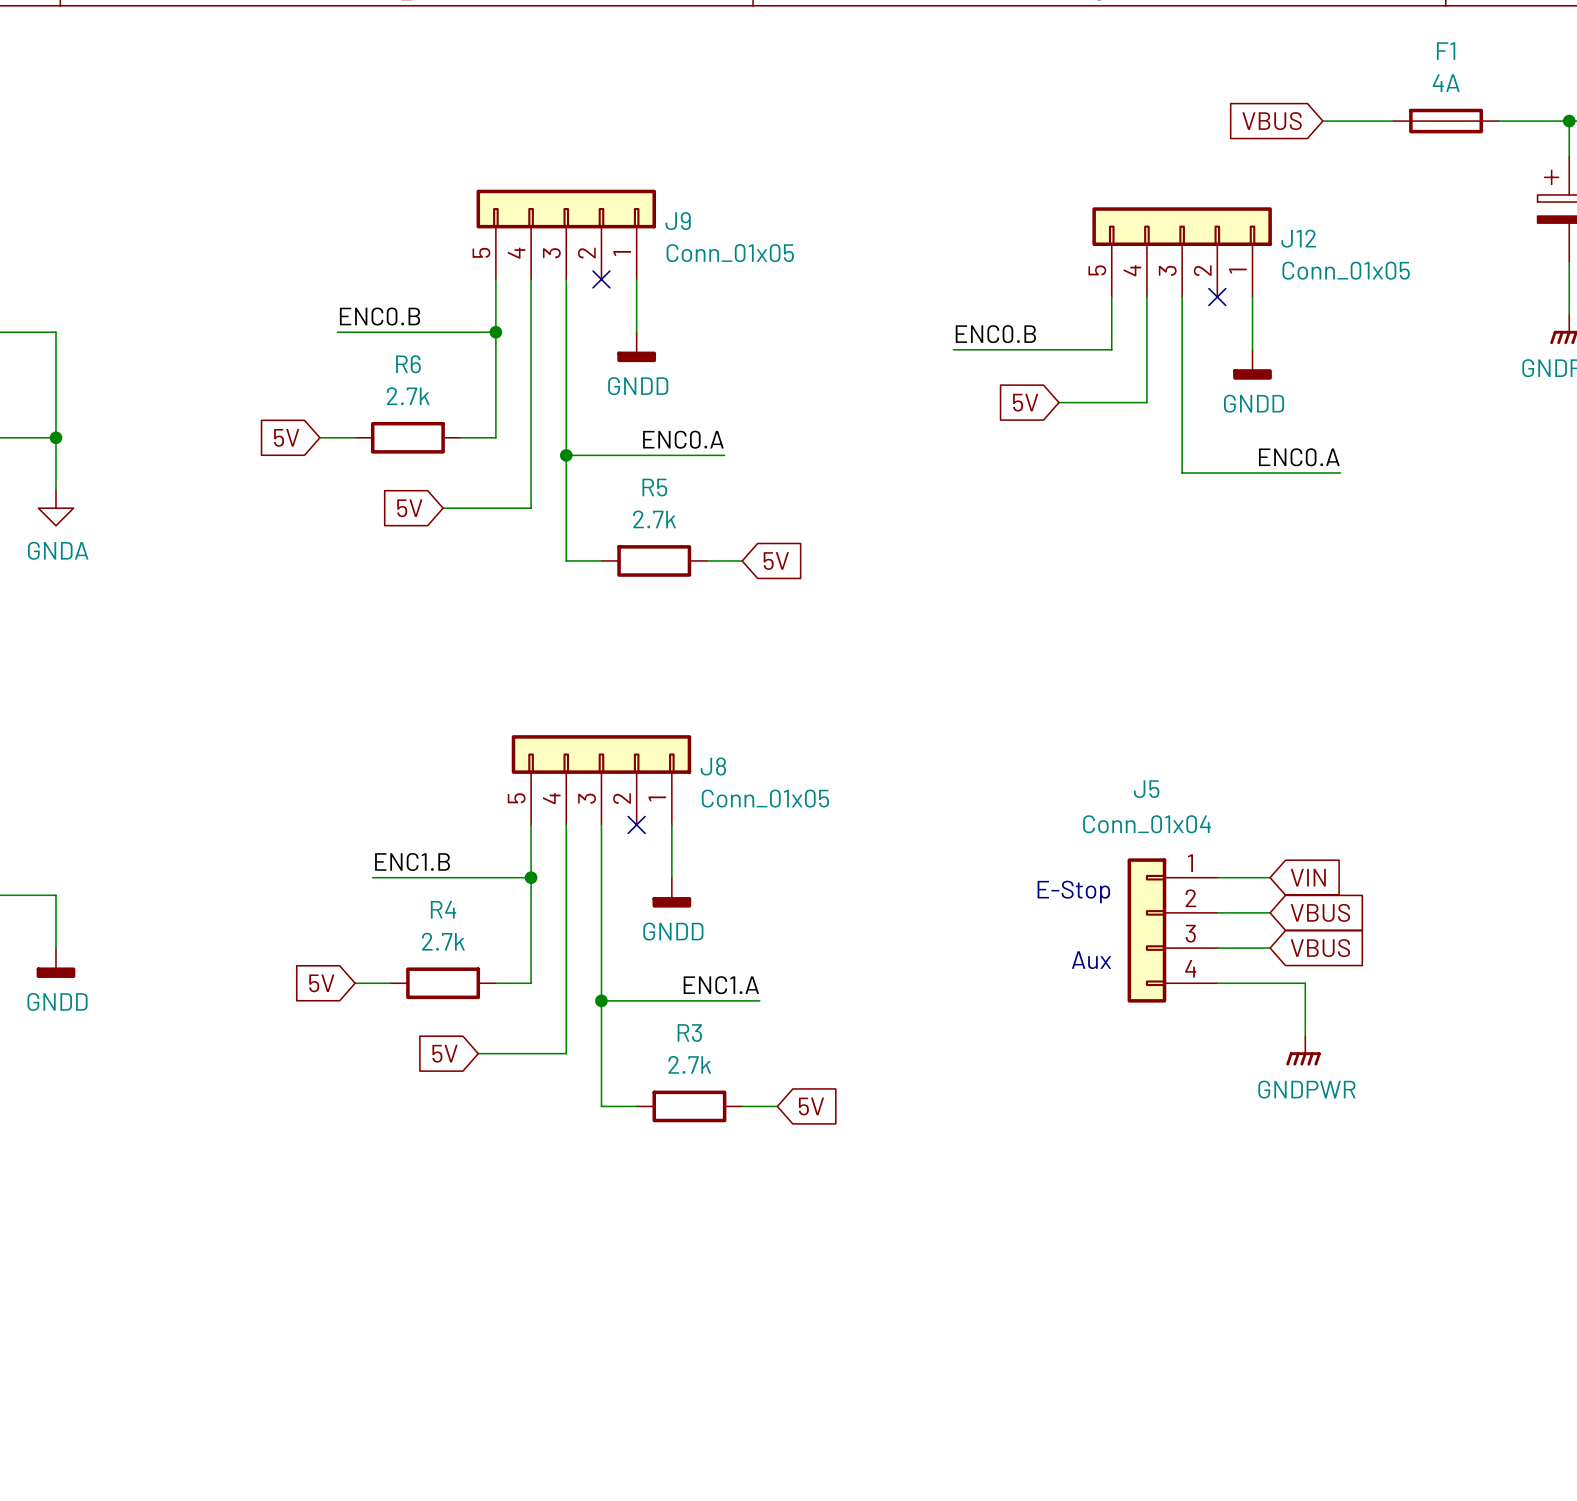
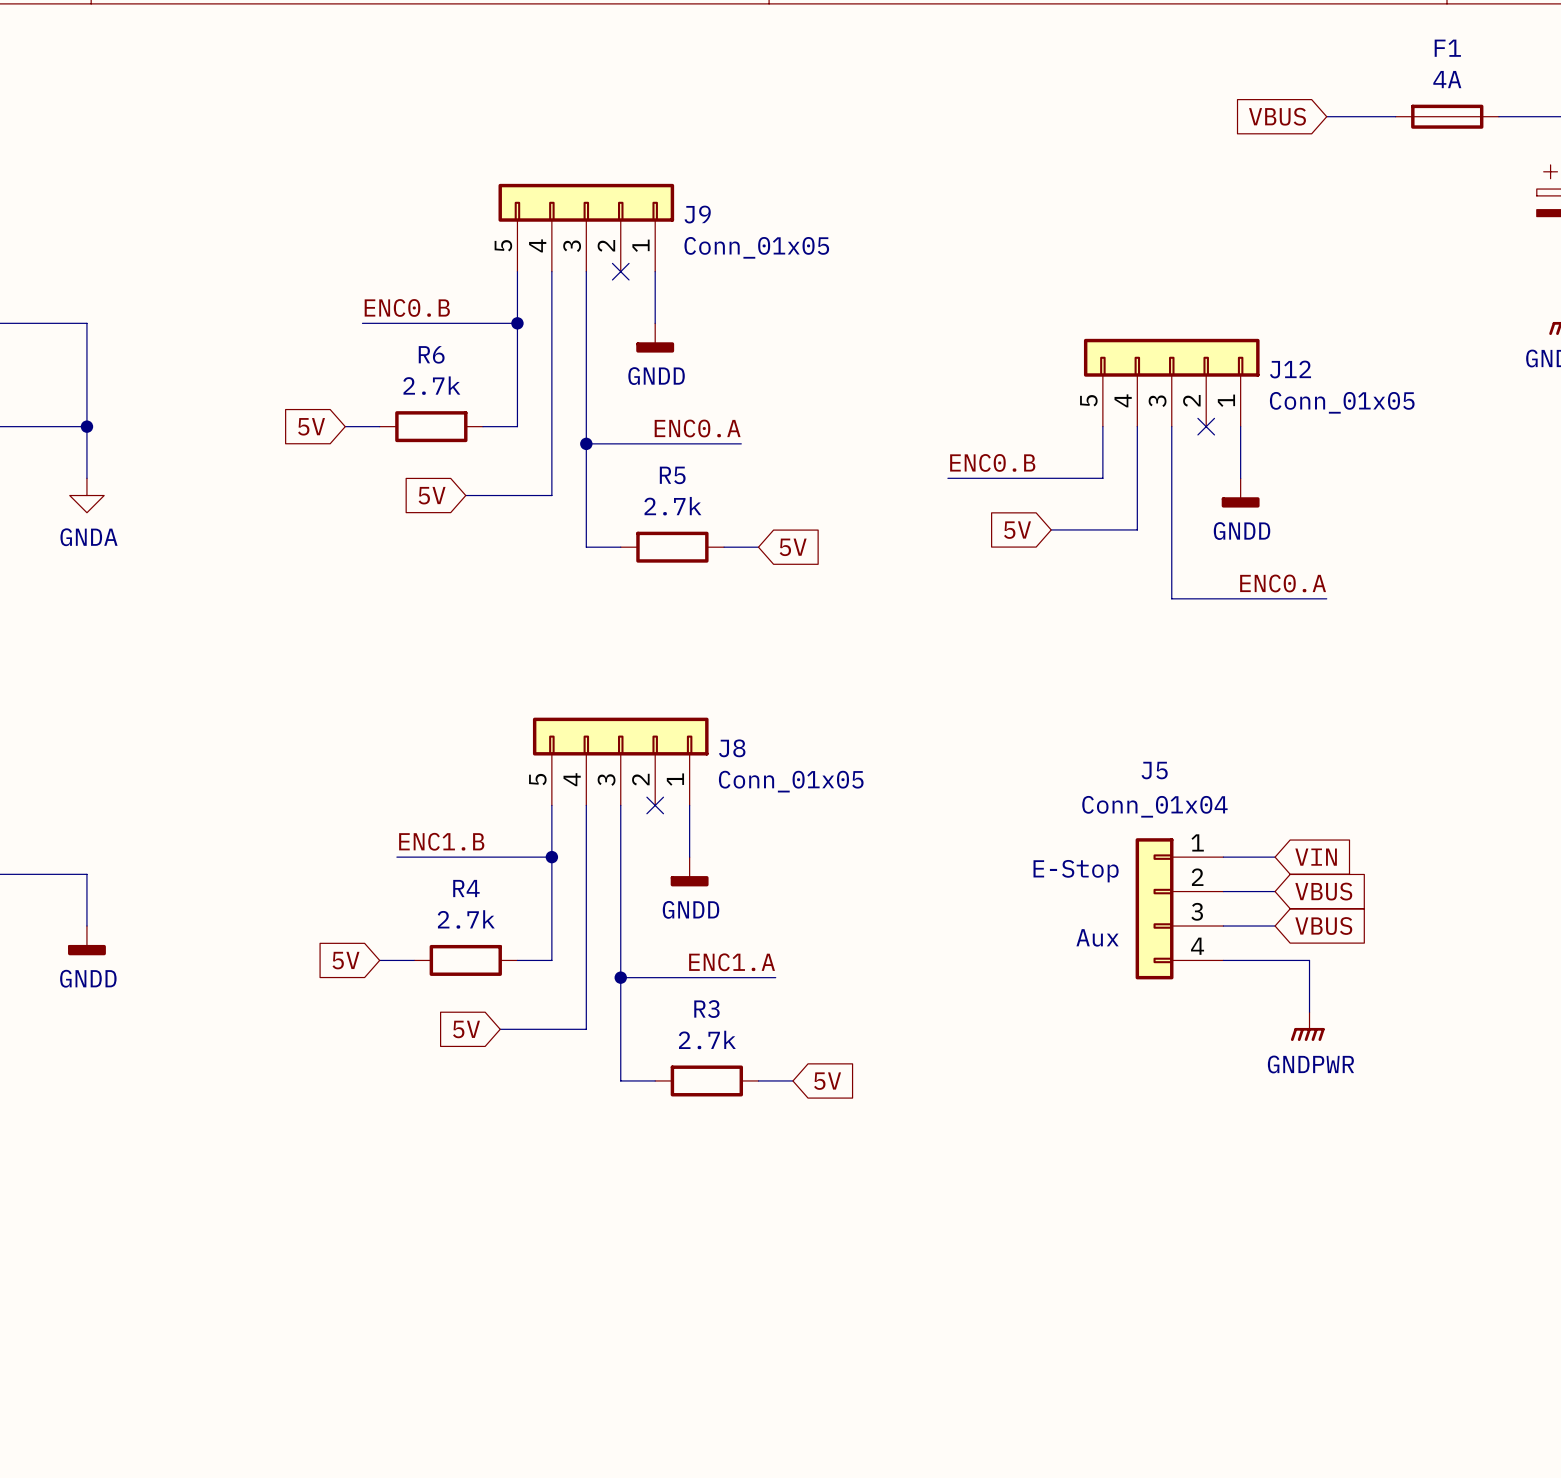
J12 position: (1182, 252) -> (1171, 382)
wire: (1111, 297) (1111, 349) (953, 349) -> (1102, 426) (1102, 478) (947, 478)
wire: (1146, 297) (1146, 402) (1058, 402) -> (1137, 426) (1137, 529) (1051, 529)
wire: (1182, 297) (1182, 472) (1340, 472) -> (1171, 426) (1171, 598) (1326, 598)
no-connect mark: (1217, 297) -> none
wire: (1252, 297) (1252, 349) -> (1240, 426) (1240, 478)
label position: ENC0.B (995, 334) -> ENC0.B (992, 462)
power symbol position: GNDD (1252, 364) -> GNDD (1240, 492)
global label position: 5V (1025, 402) -> 5V (1017, 530)
no-connect mark: none -> (1206, 426)
label position: ENC0.A (1299, 457) -> ENC0.A (1283, 583)

